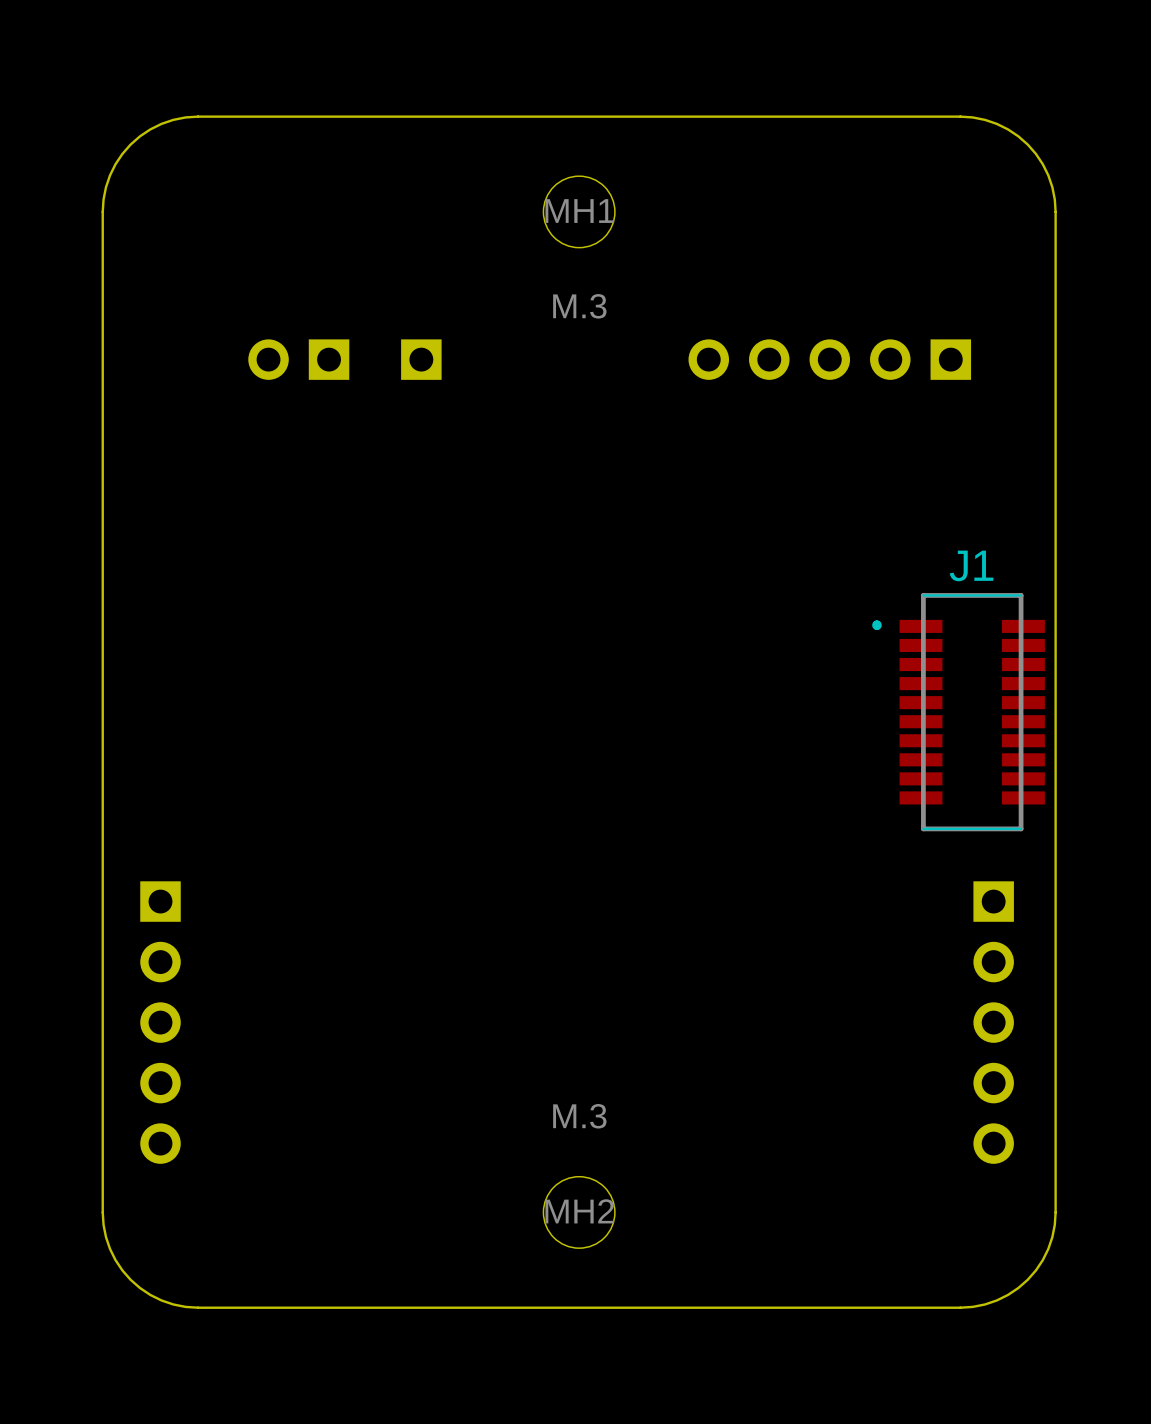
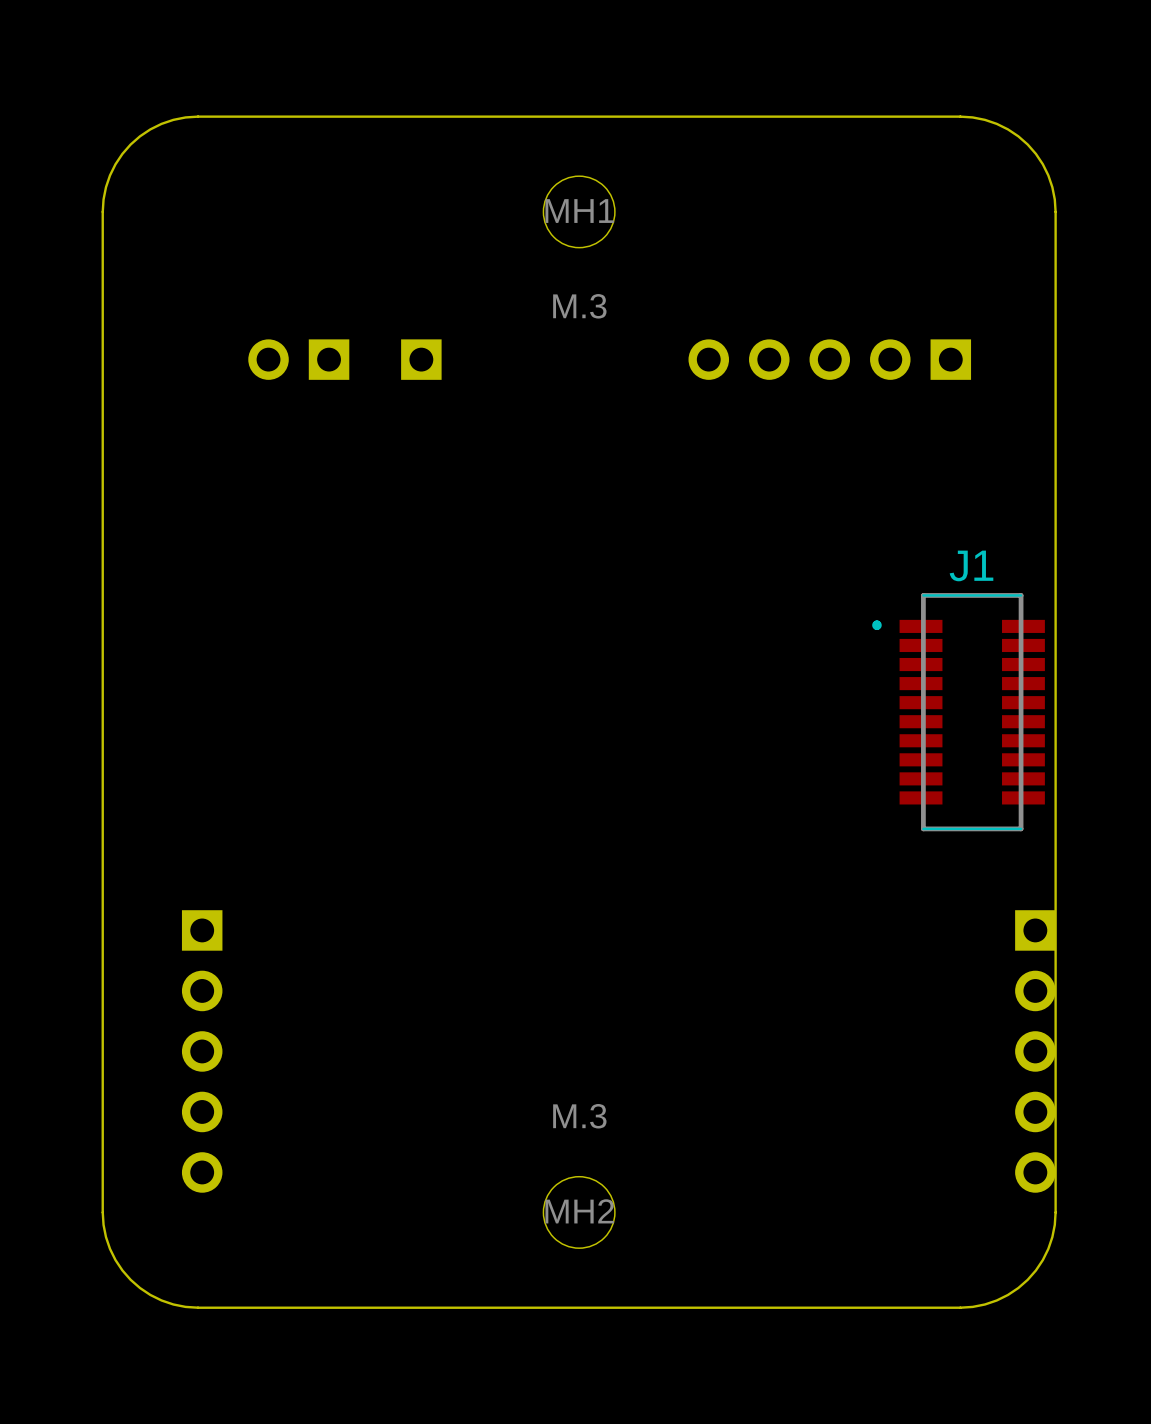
part position: (160, 1022) -> (202, 1051)
part position: (993, 1022) -> (1035, 1051)

